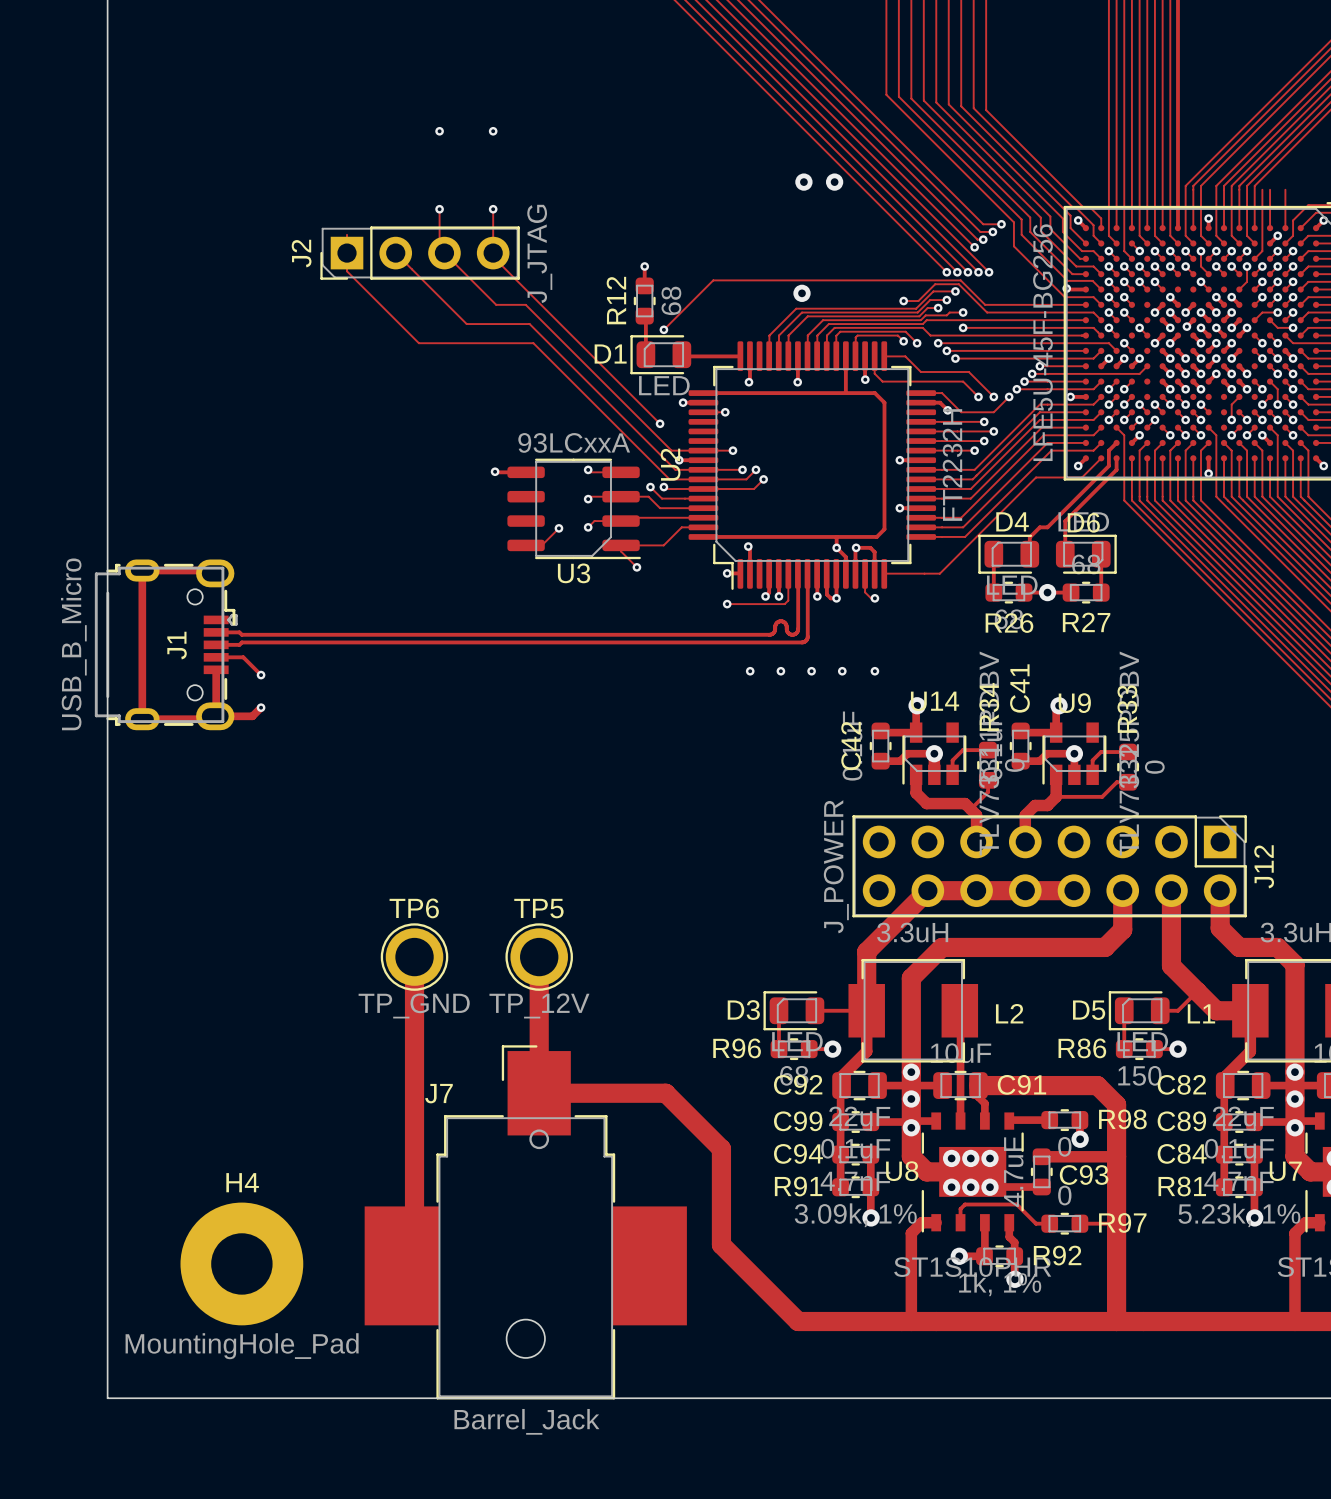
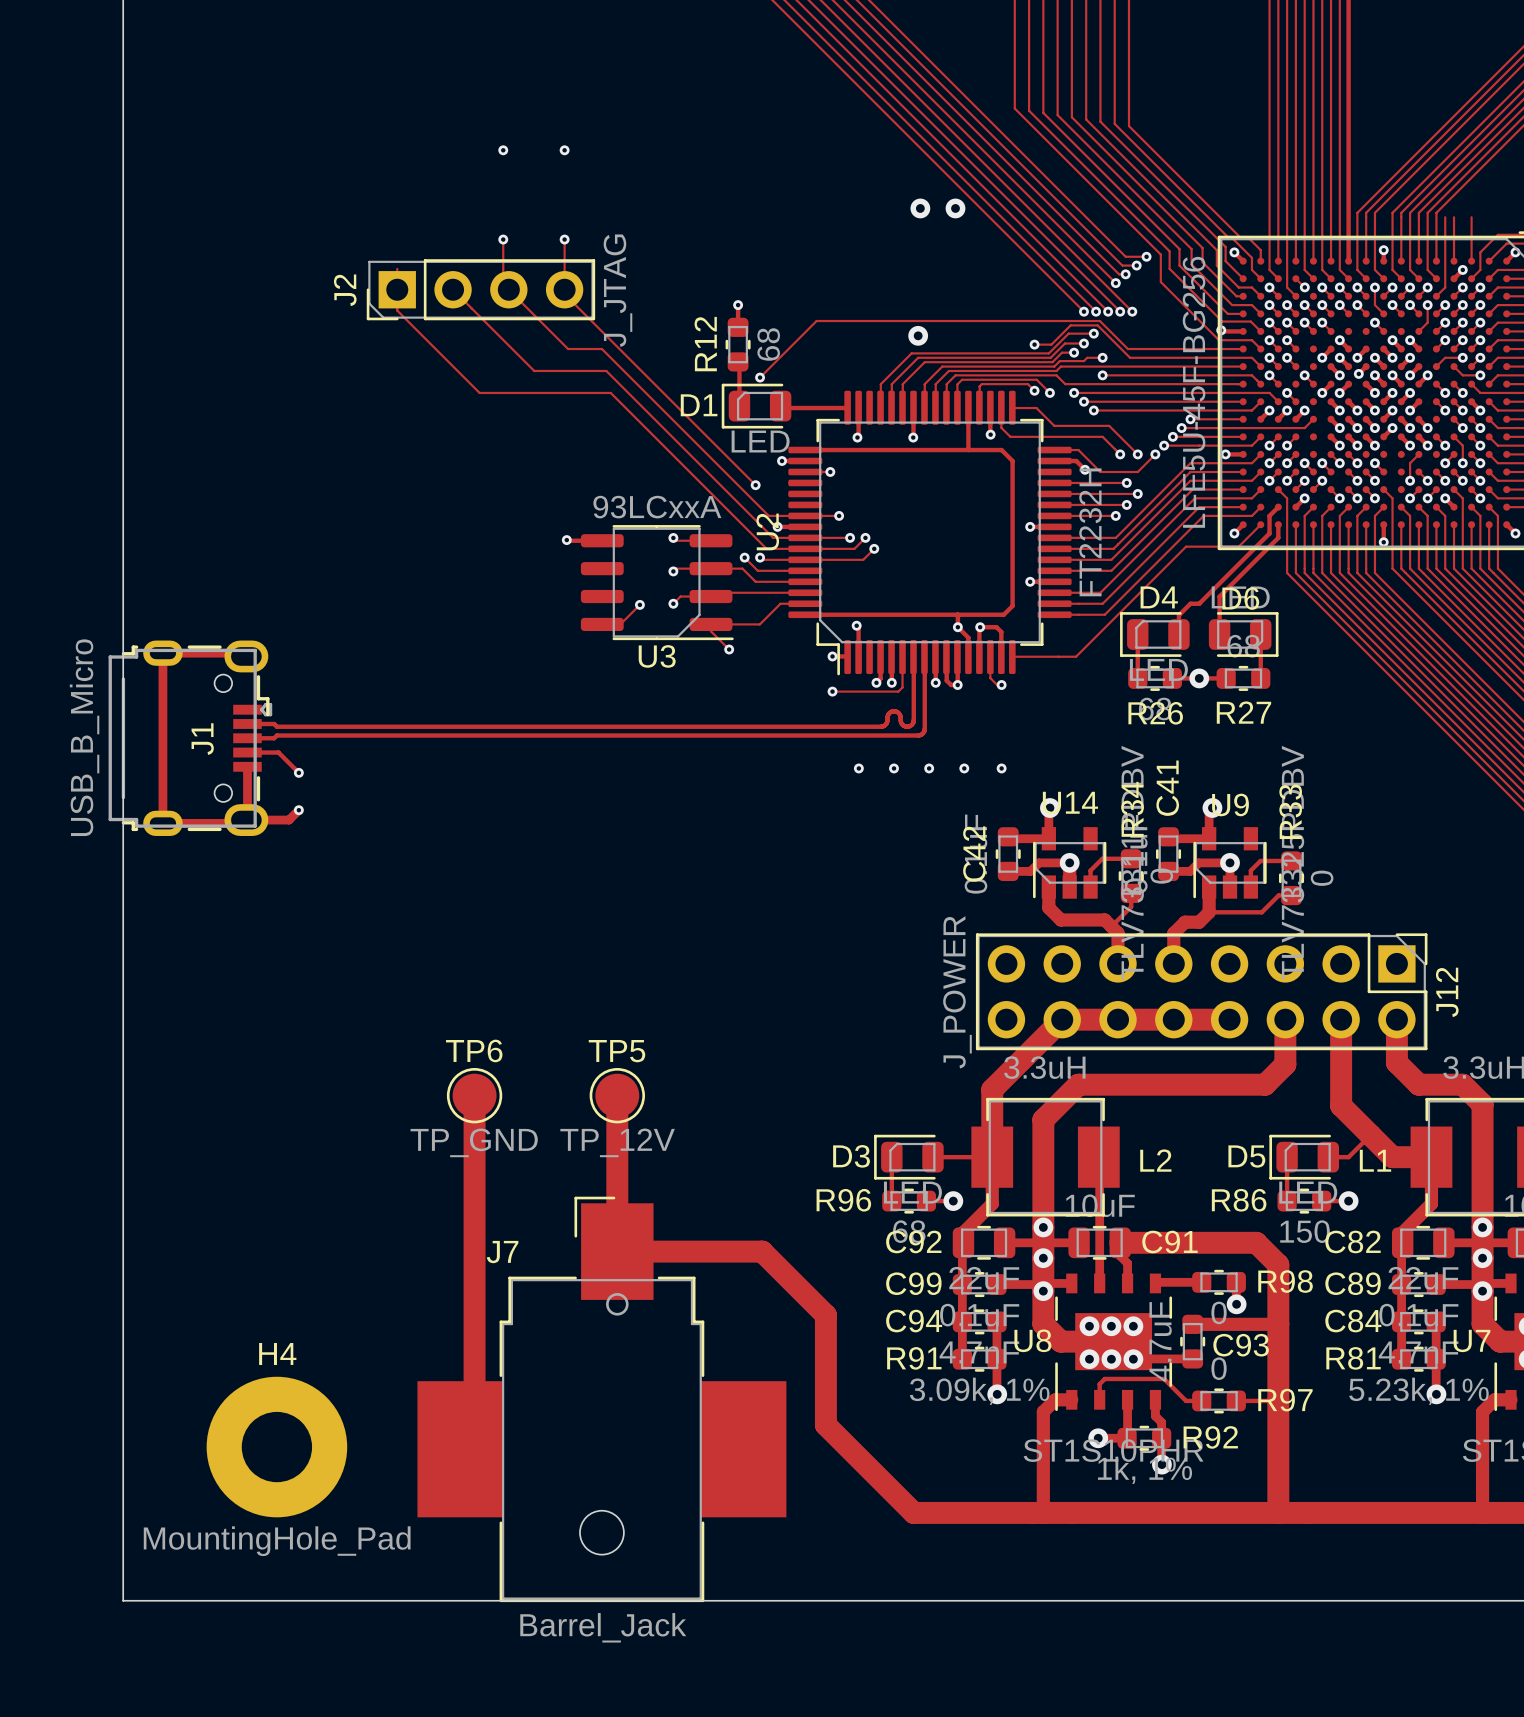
TP6 footprint: [380, 923, 449, 991] -> [446, 1068, 503, 1124]
TP5 footprint: [505, 923, 573, 991] -> [589, 1068, 645, 1124]

